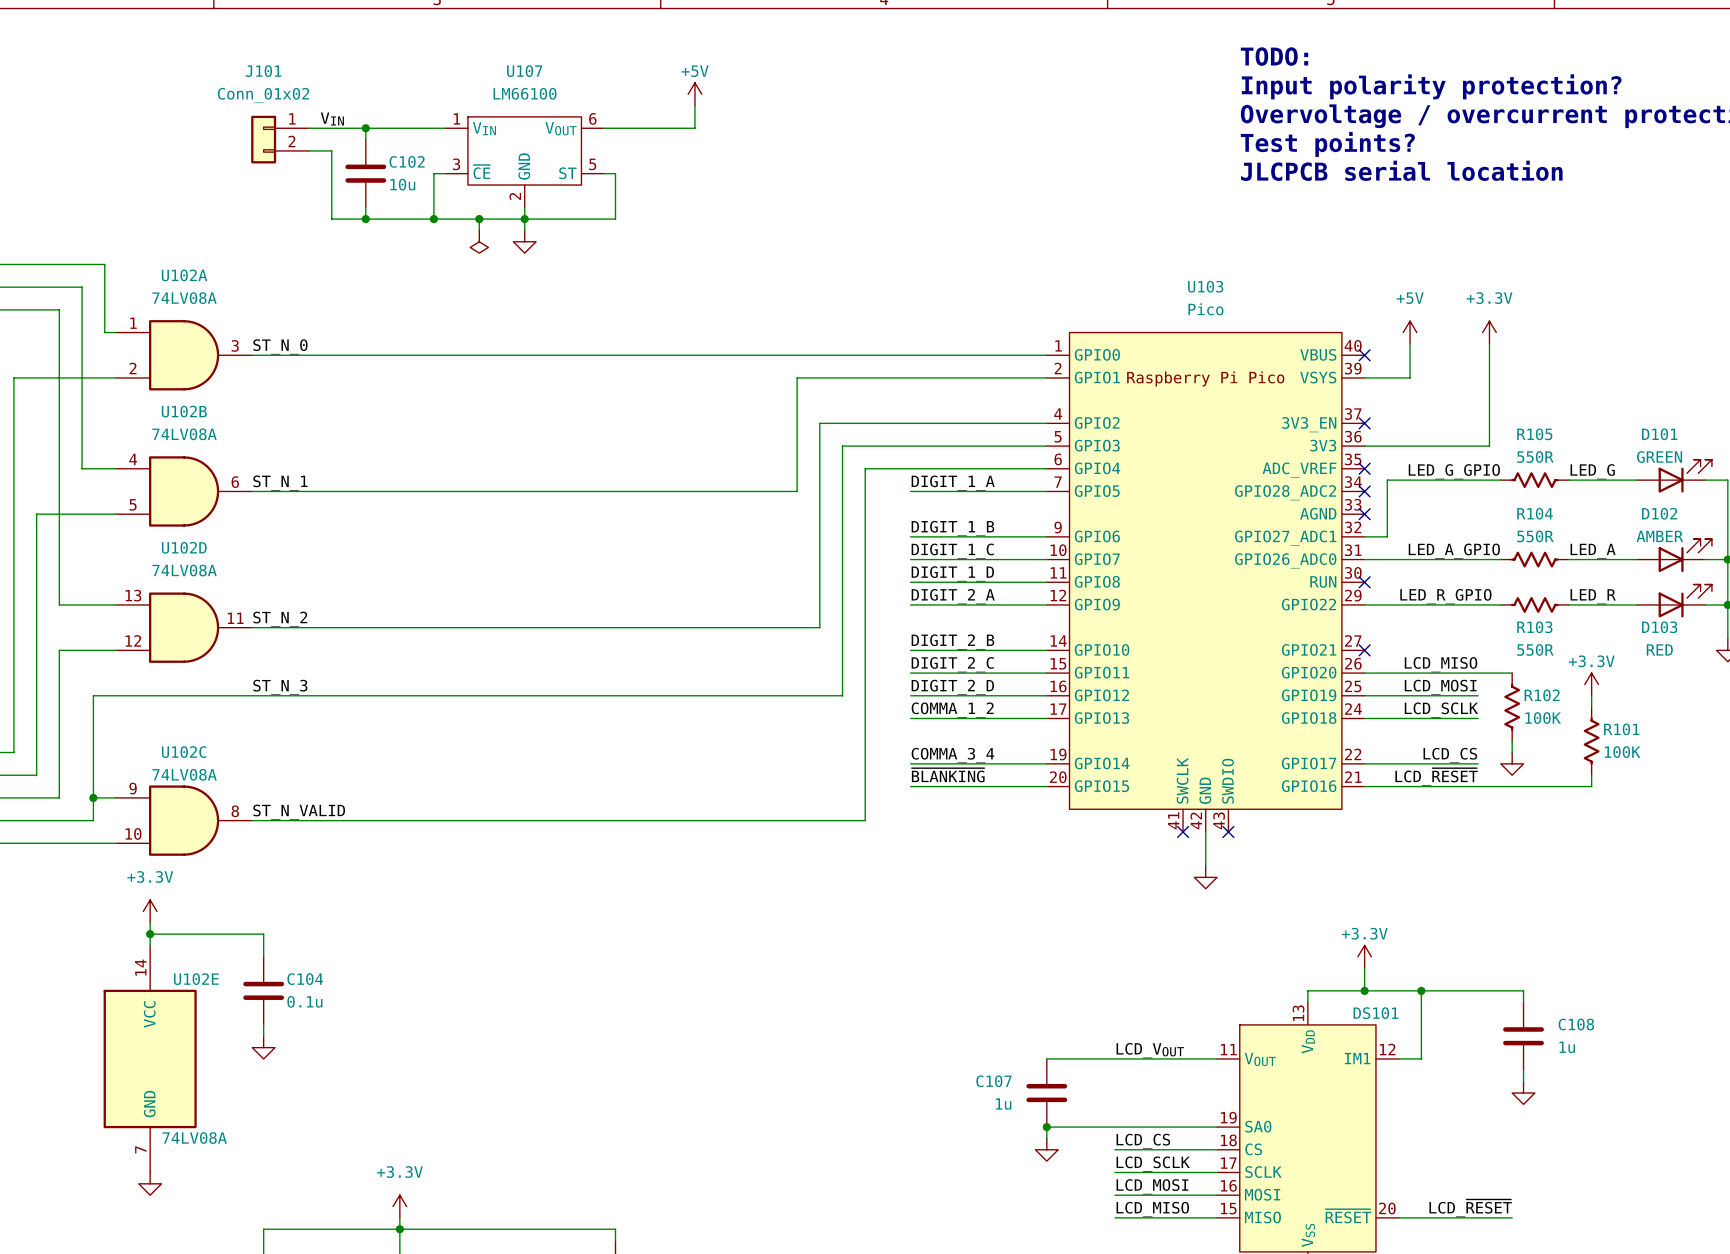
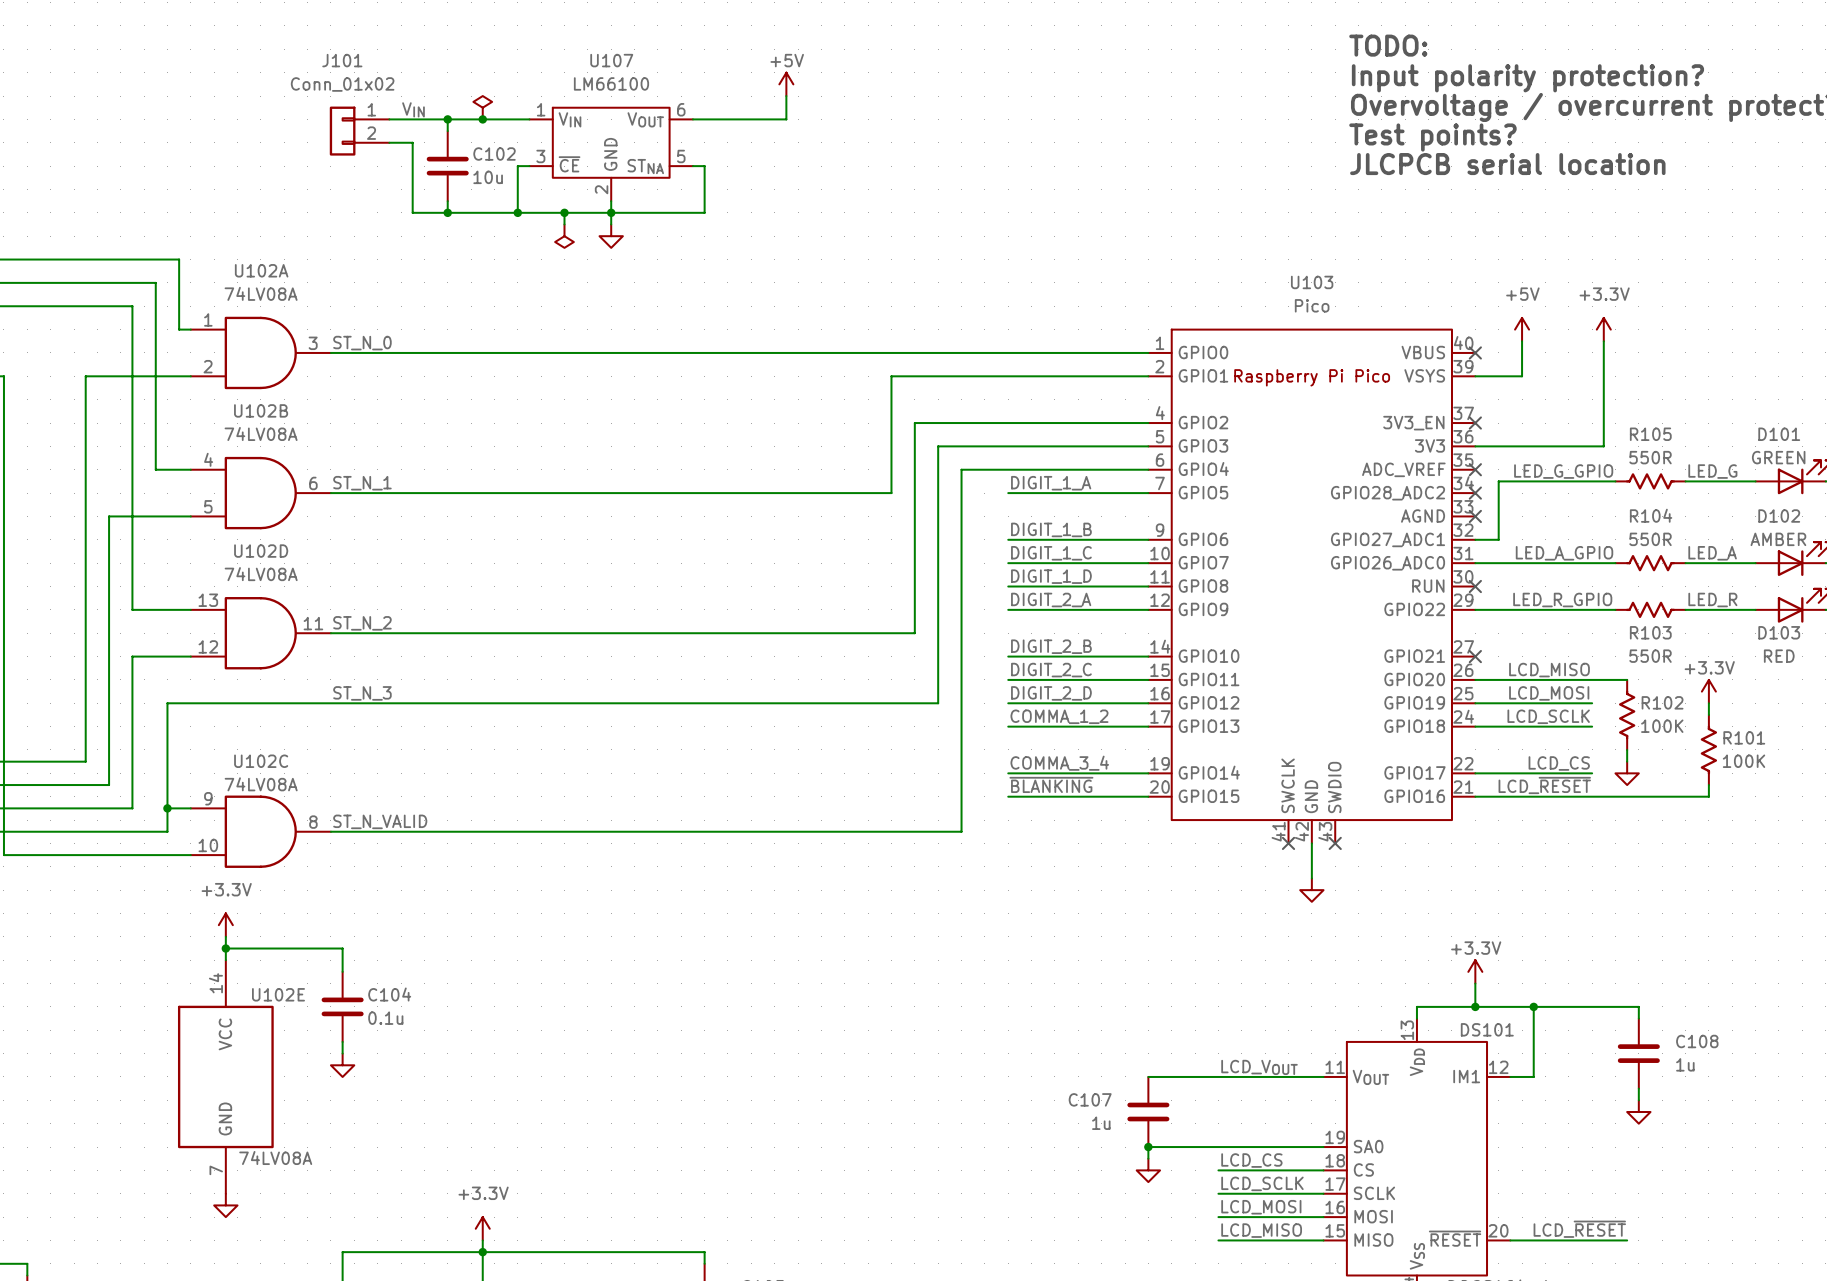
power symbol: none -> (482, 107)
junction: none -> (482, 119)
U107 pin name: ST (567, 173) -> STNA (645, 166)

